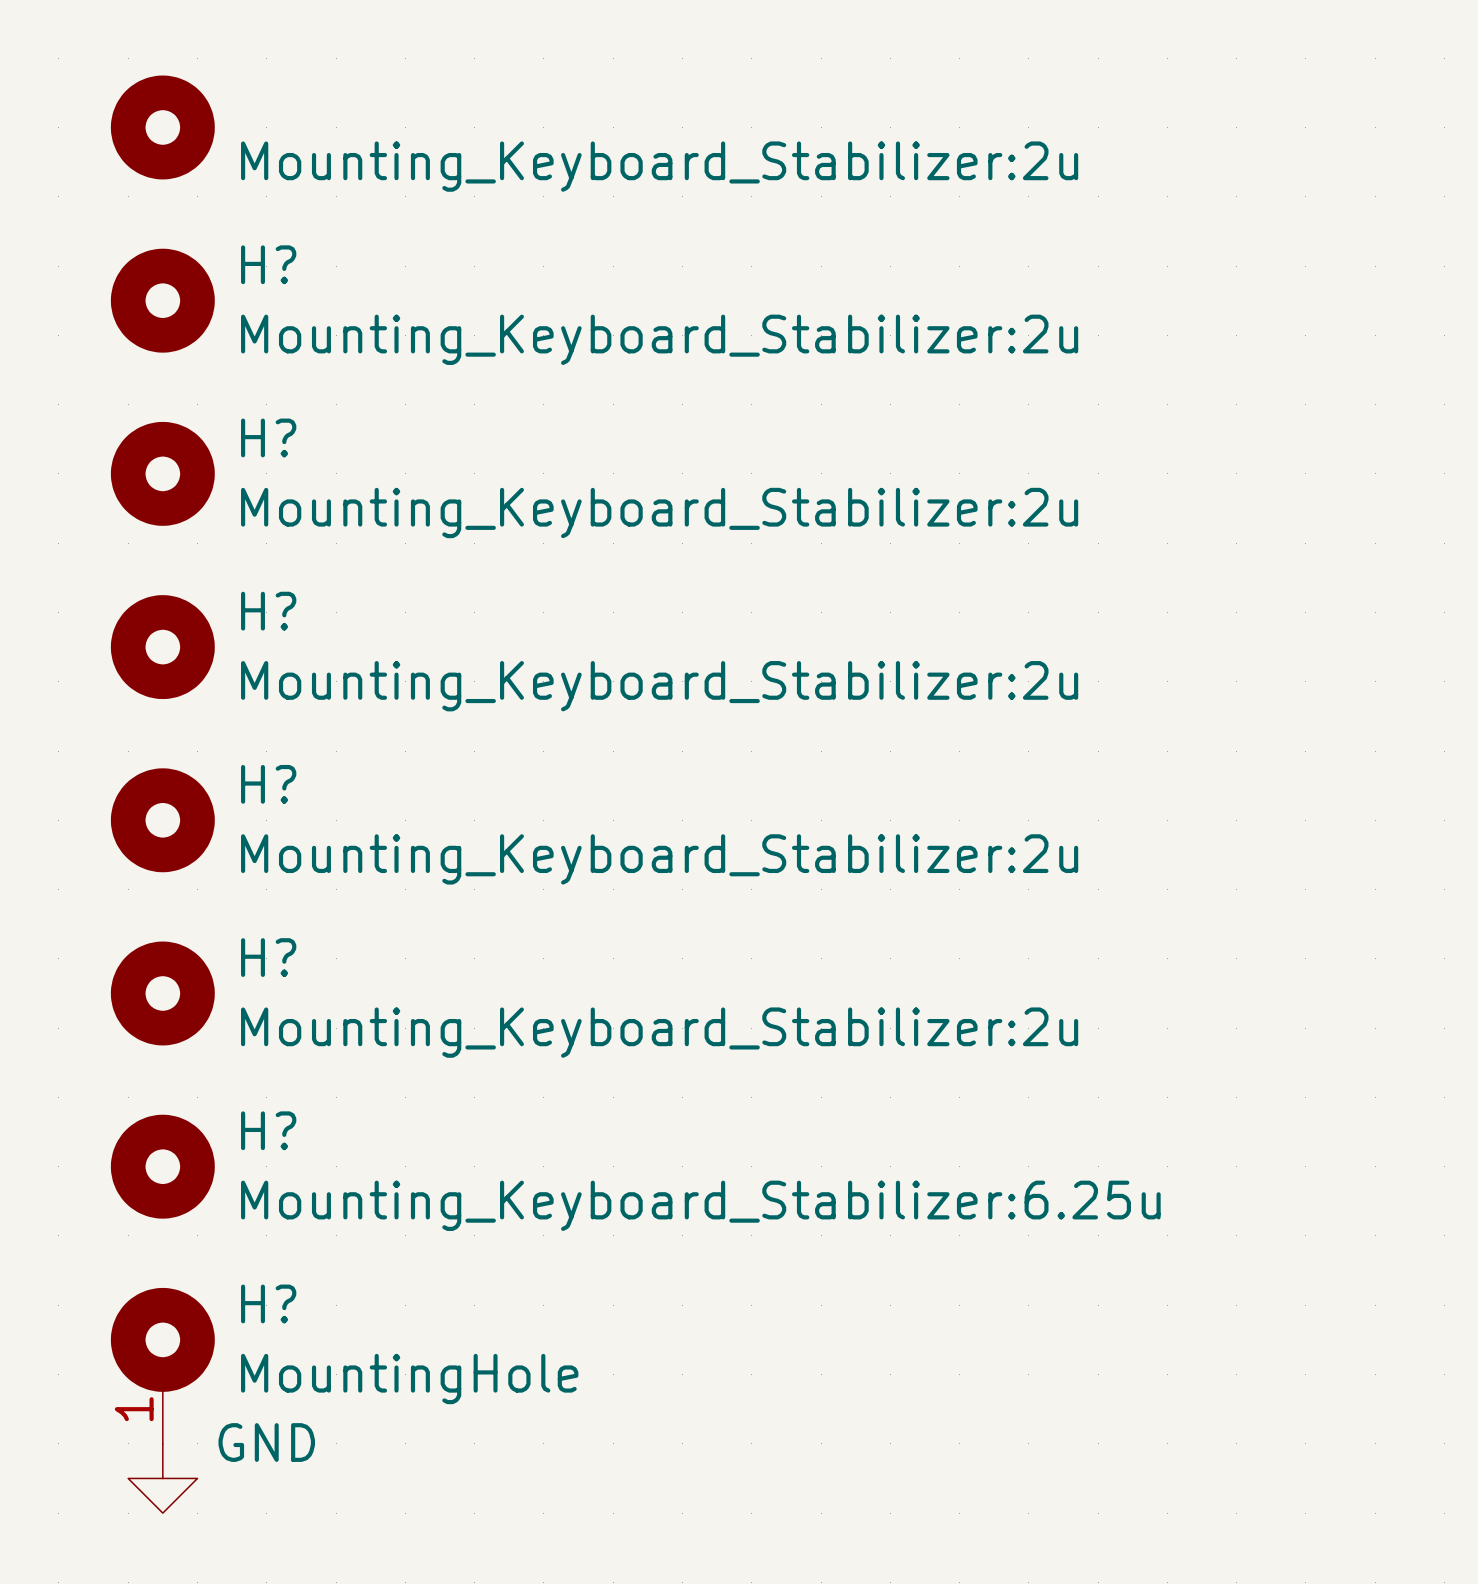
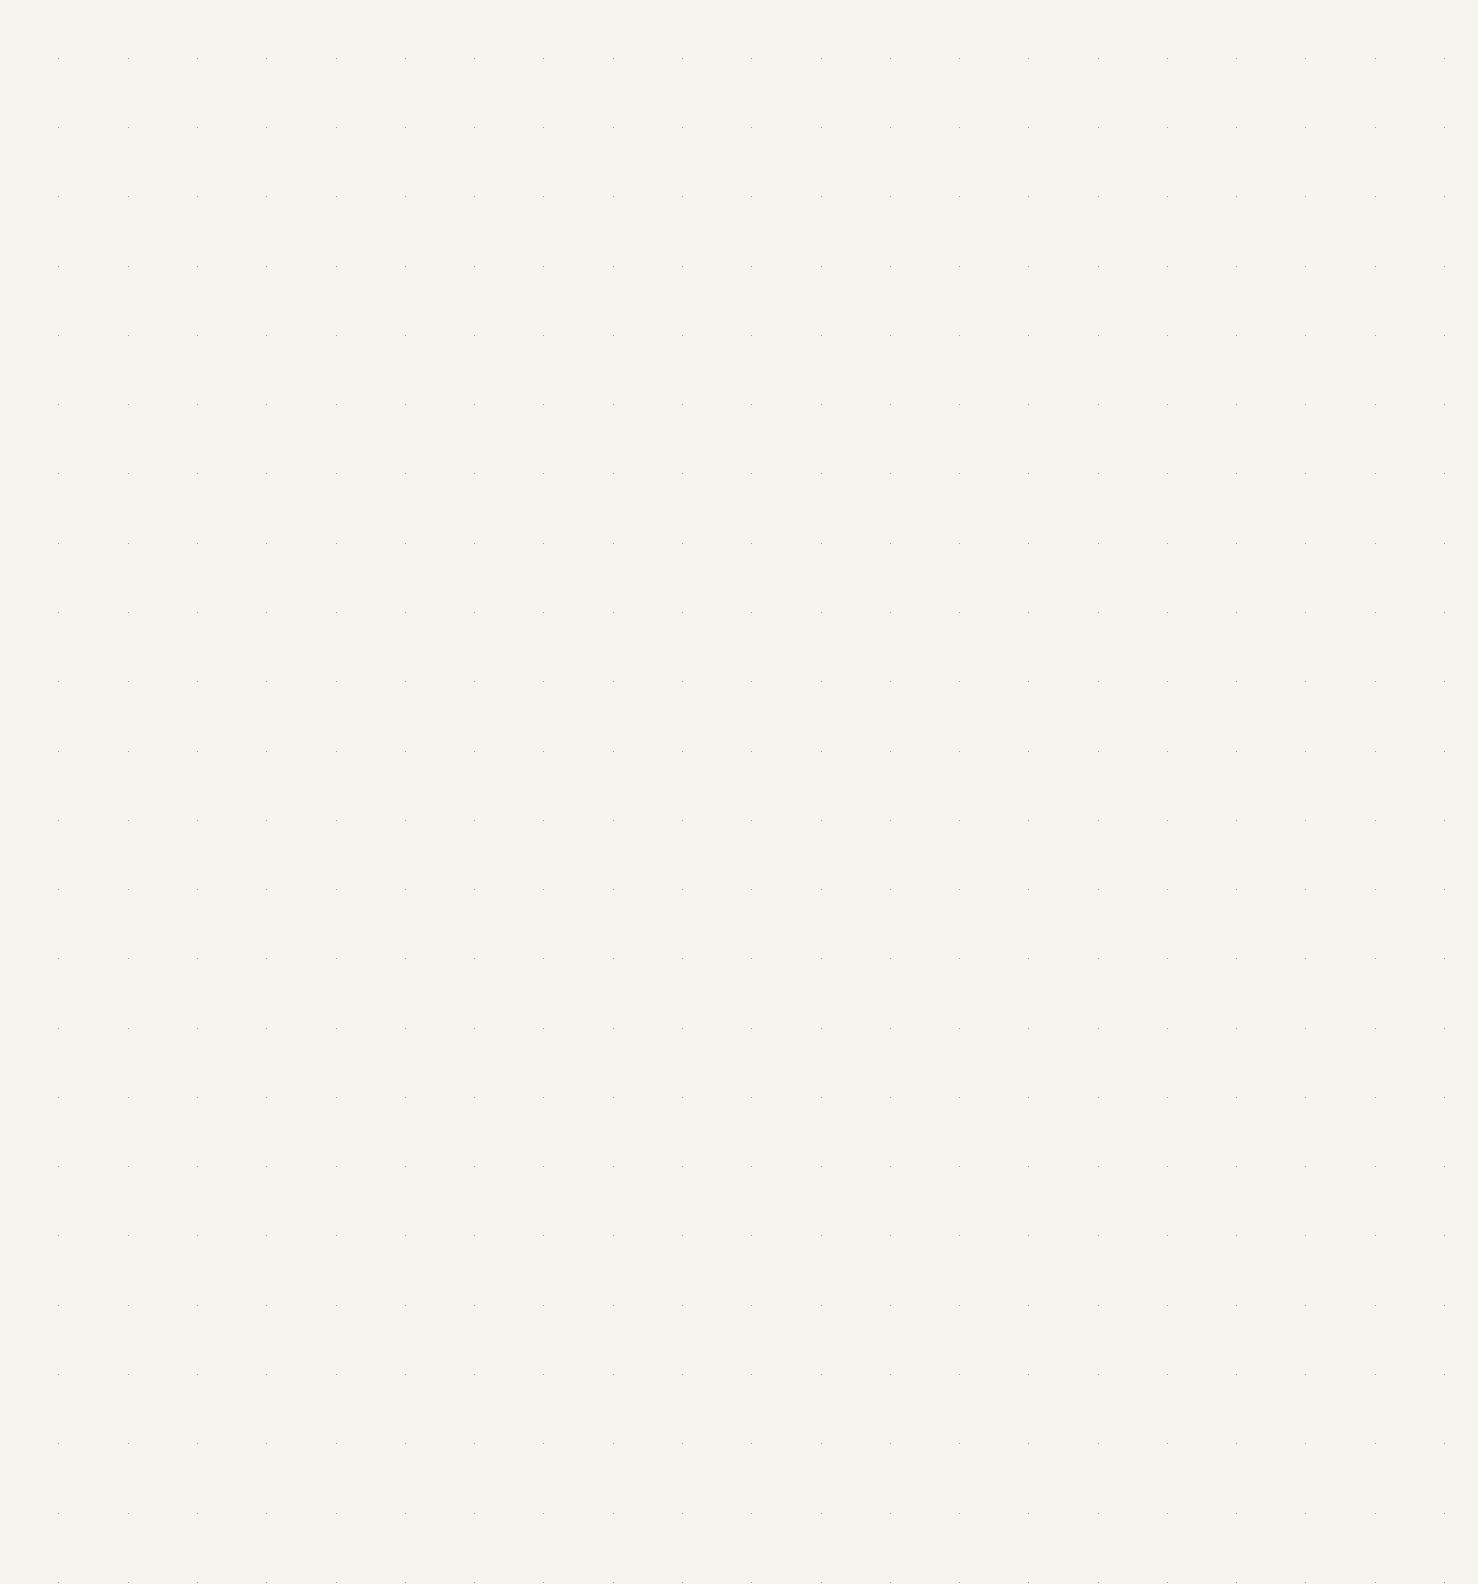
part: Mounting_Keyboard_Stabilizer:2u (162, 127) -> none
H?: Mounting_Keyboard_Stabilizer:2u (162, 300) -> none
H?: Mounting_Keyboard_Stabilizer:2u (162, 473) -> none
H?: Mounting_Keyboard_Stabilizer:2u (162, 647) -> none
H?: Mounting_Keyboard_Stabilizer:2u (162, 820) -> none
H?: Mounting_Keyboard_Stabilizer:2u (162, 993) -> none
H?: Mounting_Keyboard_Stabilizer:6.25u (162, 1166) -> none
H?: MountingHole (162, 1365) -> none
power symbol: GND (162, 1478) -> none

